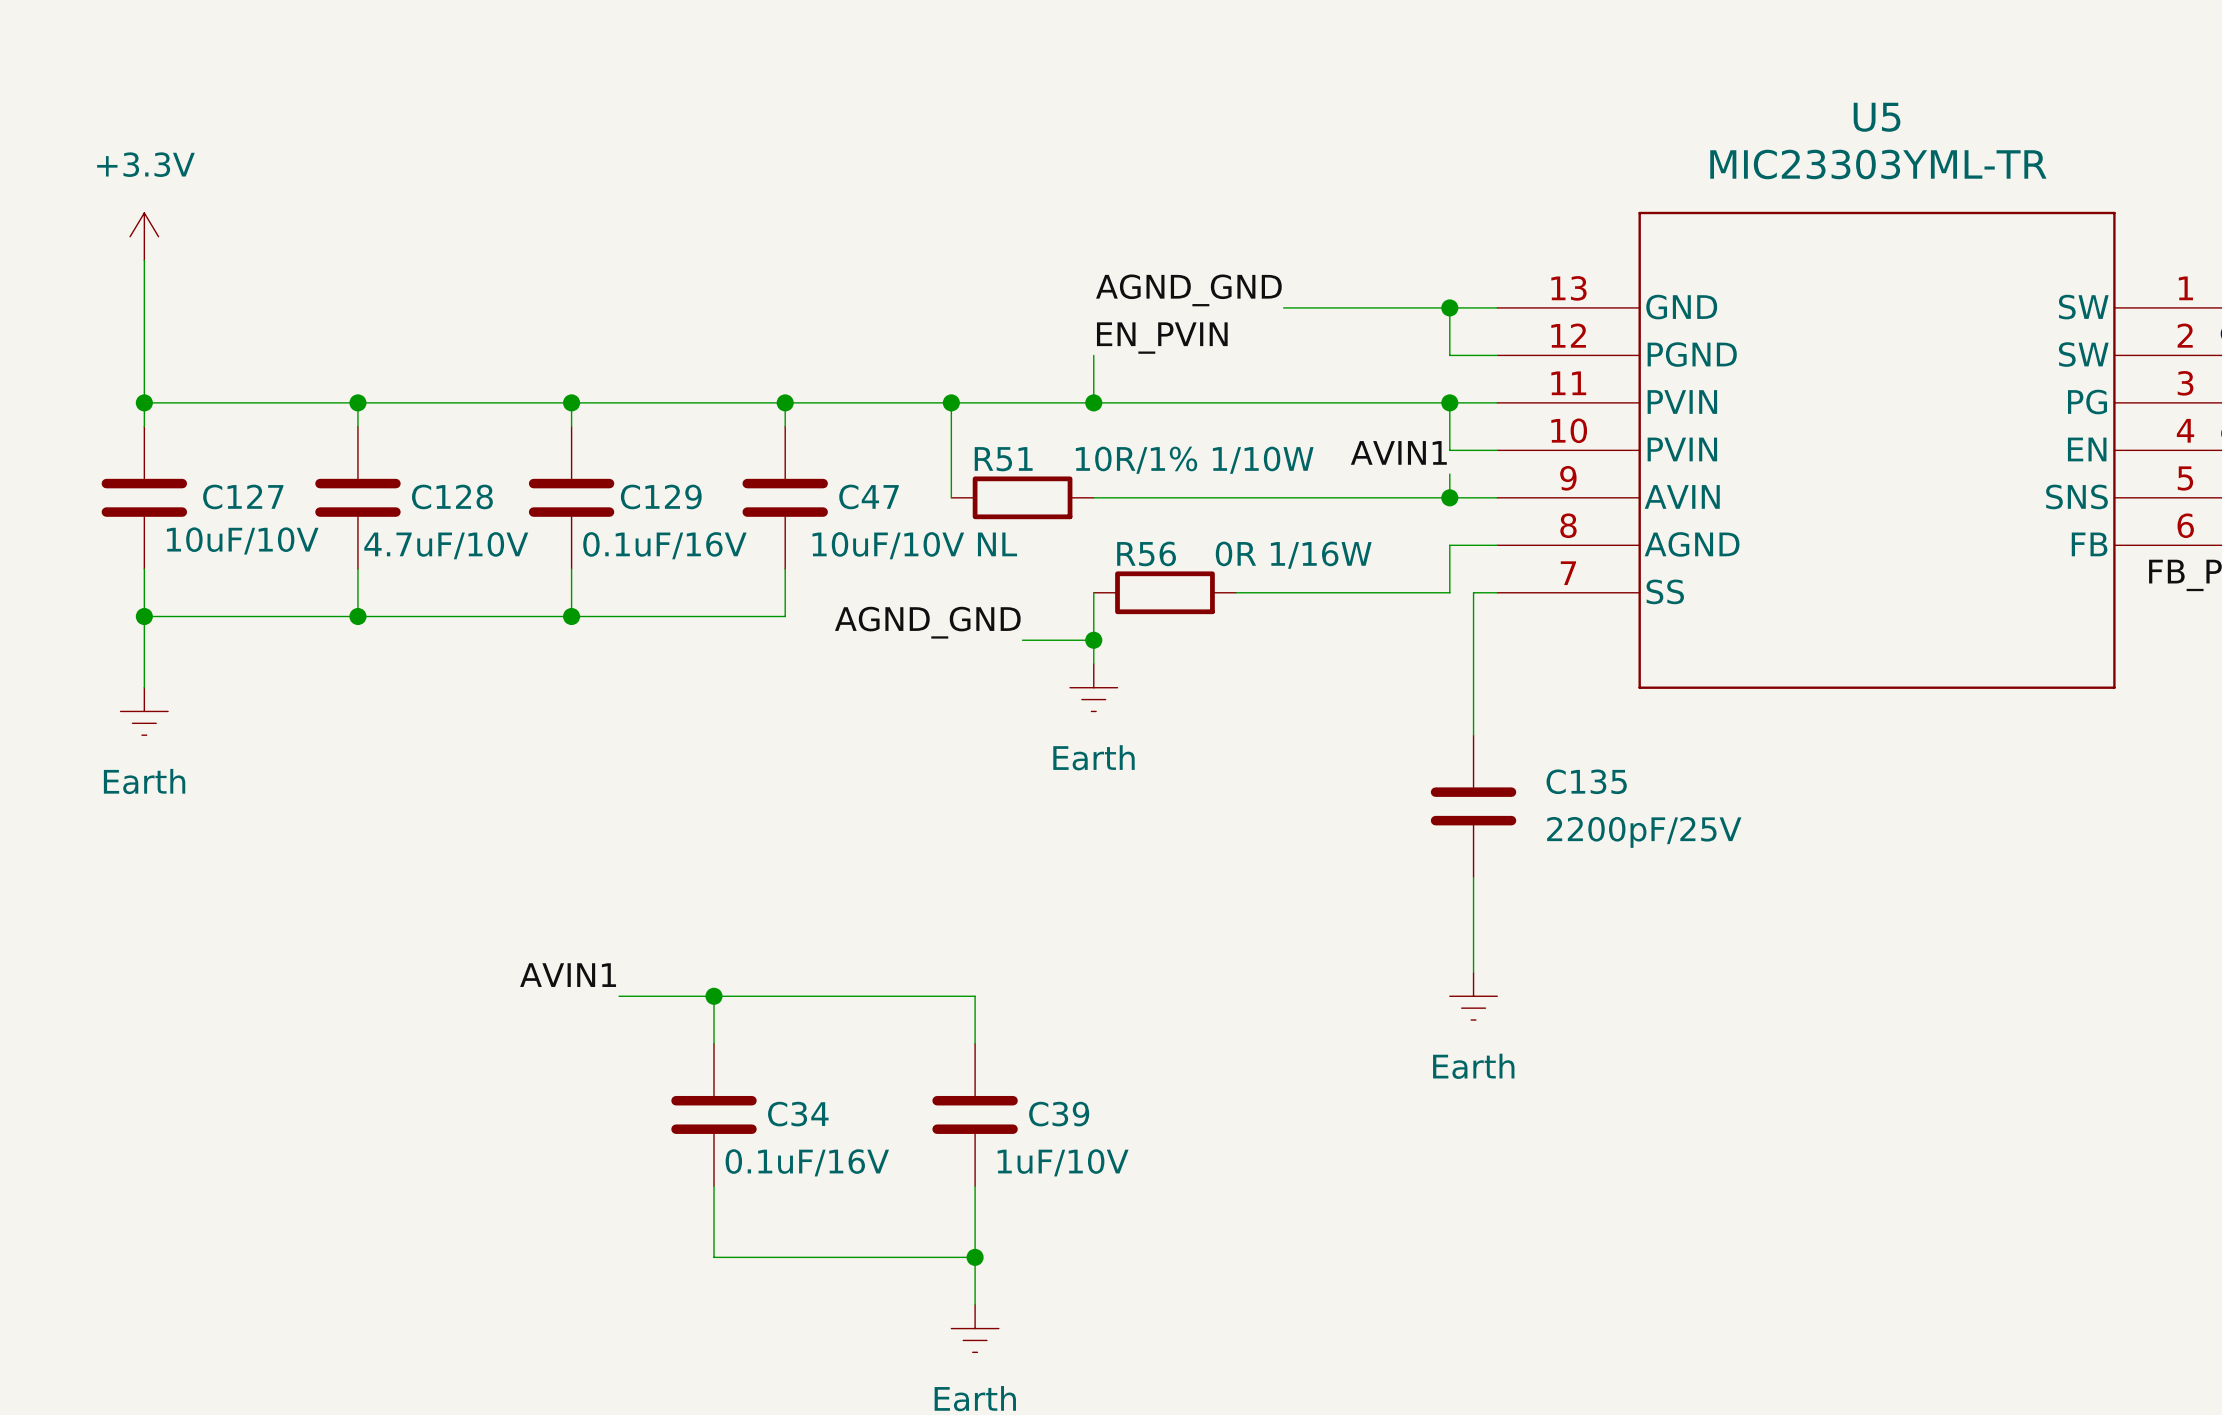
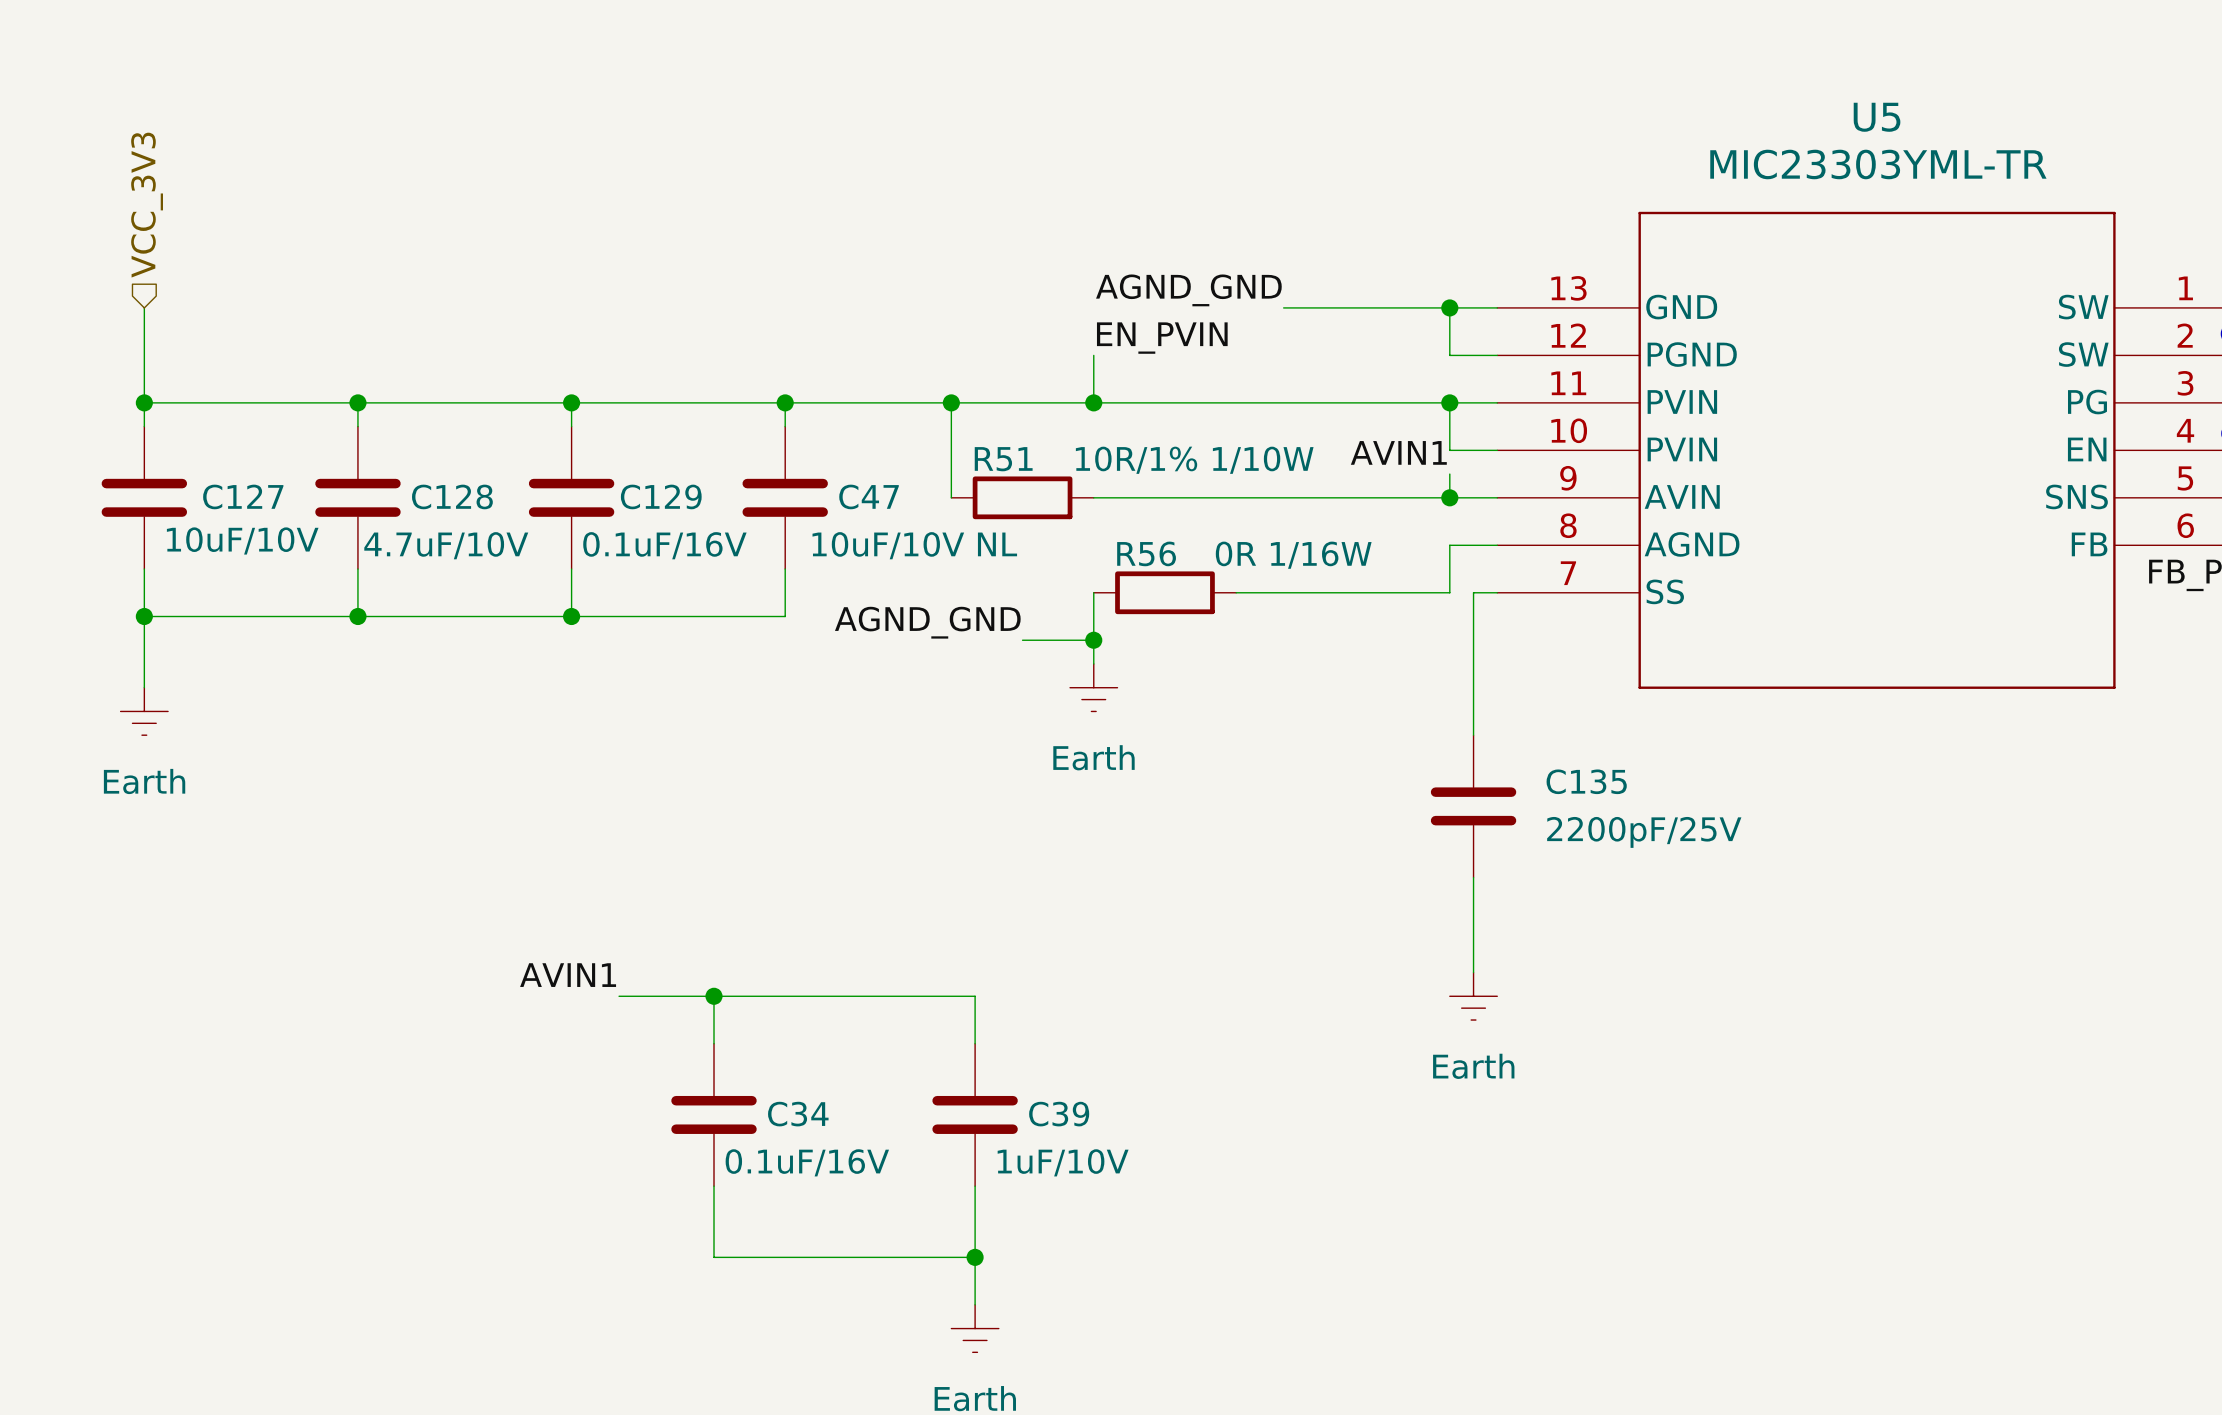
hierarchical label: none -> VCC_3V3 (147, 205)
power symbol: +3.3V (144, 236) -> none
wire: (144, 260) (144, 307) -> none

